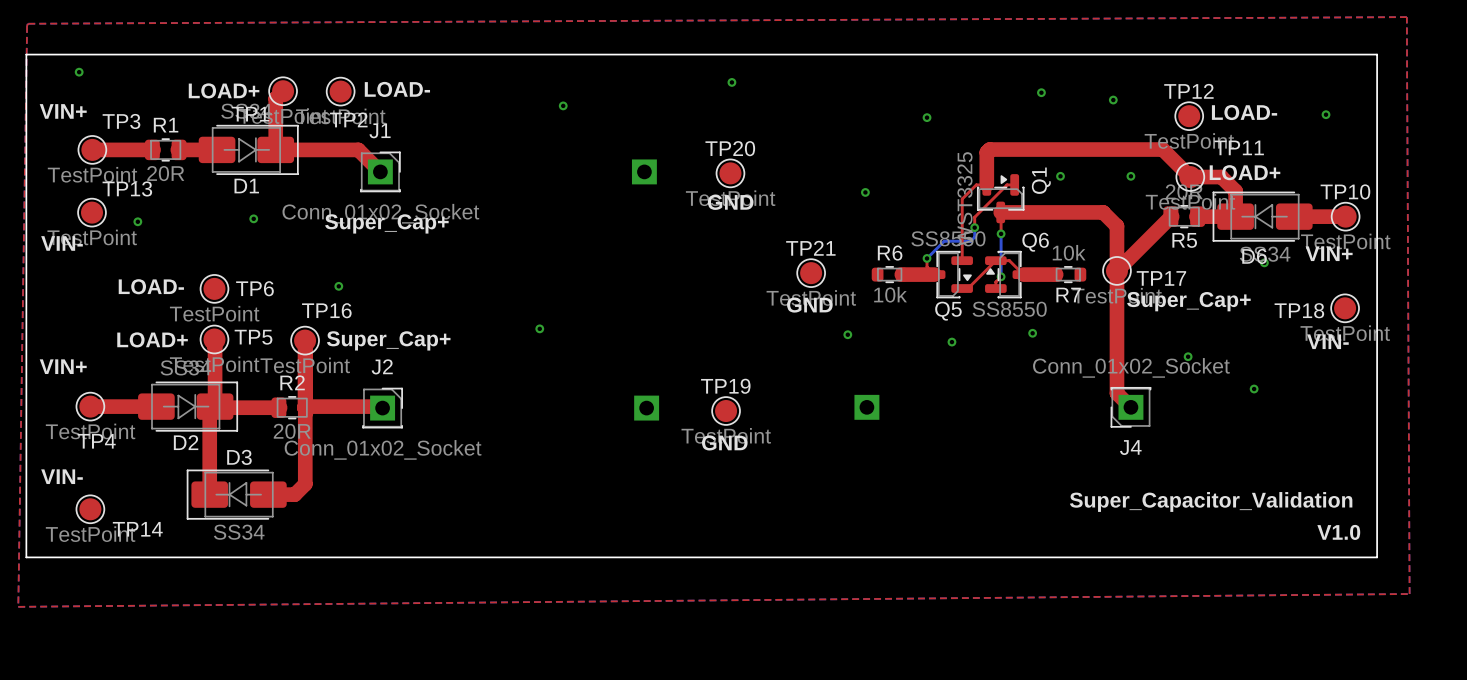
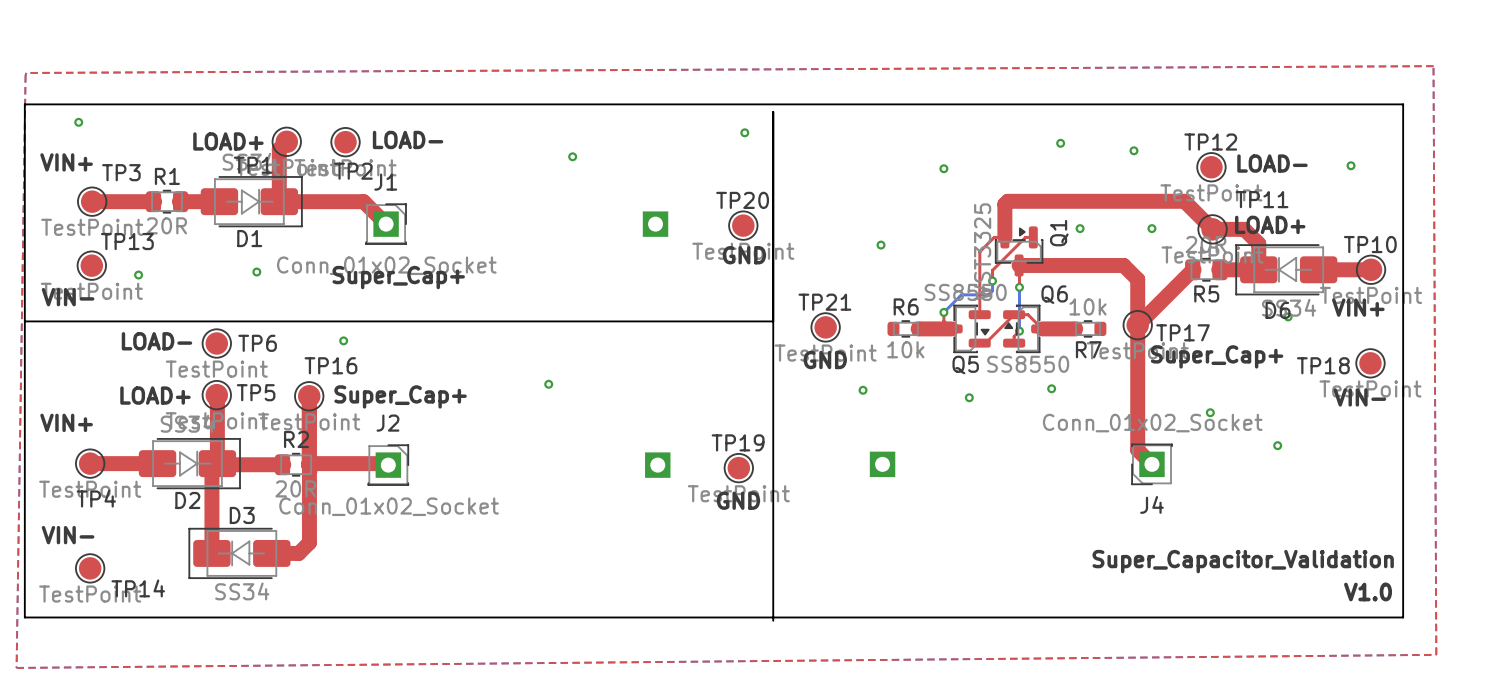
board edge: none -> (773, 111) (773, 620)
board edge: none -> (24, 321) (773, 321)

